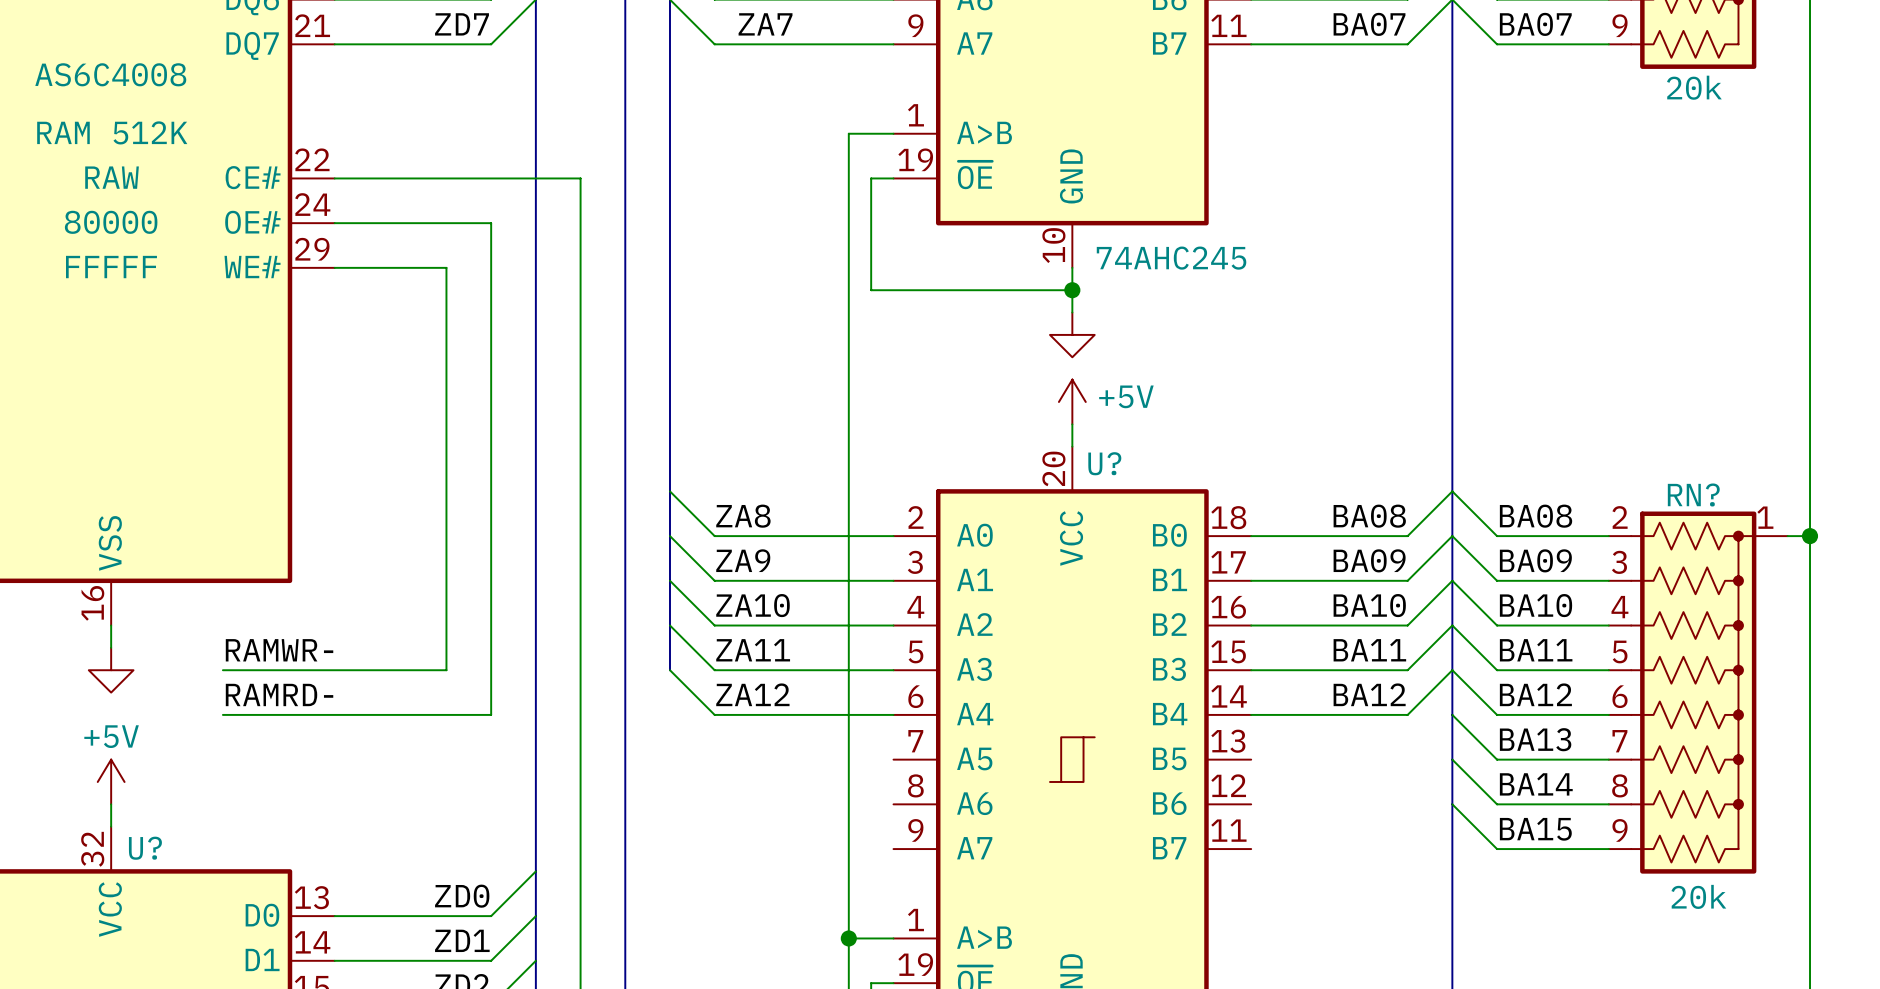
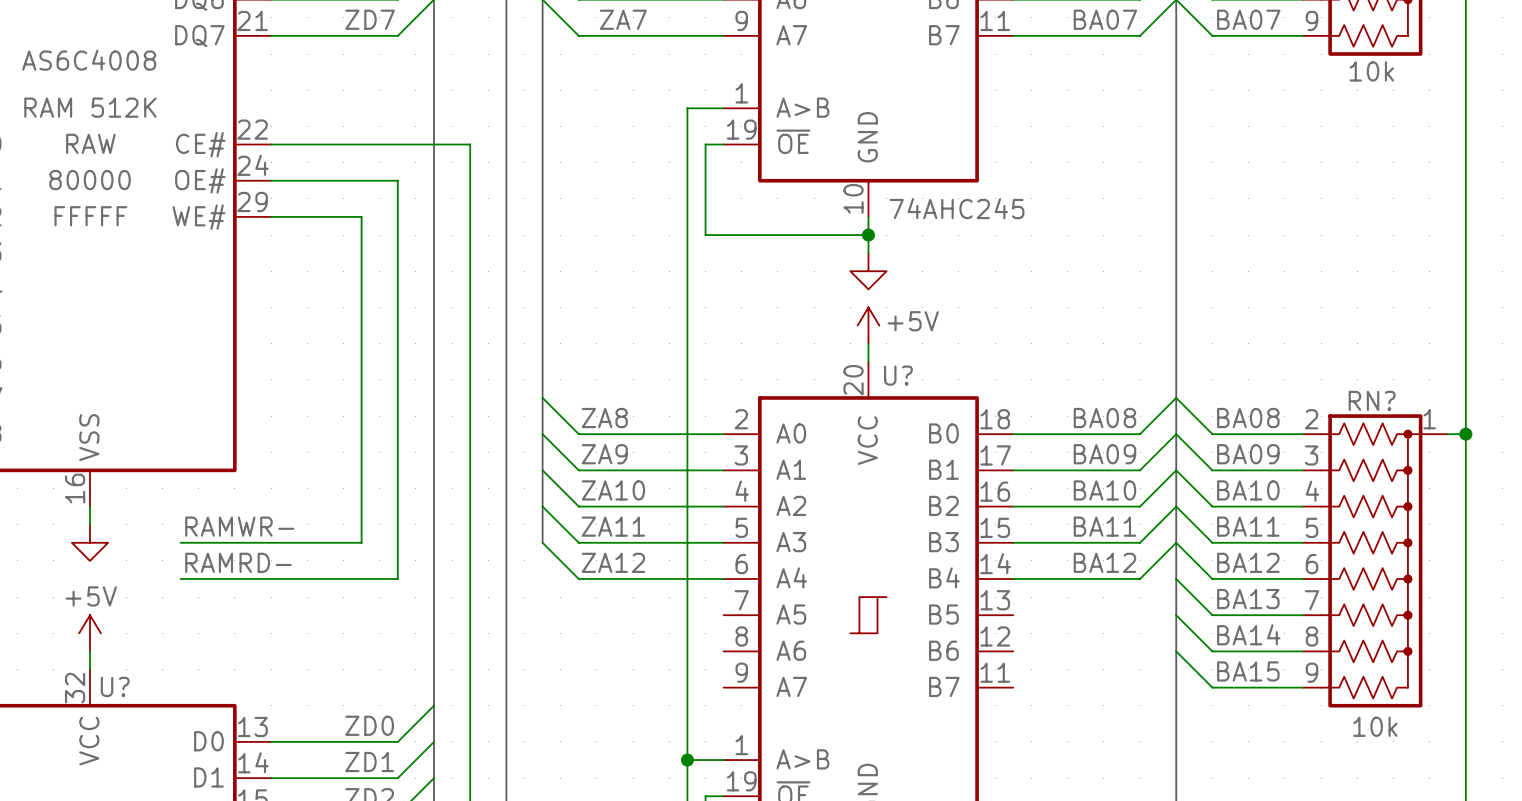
part value: 20k (1694, 87) -> 10k (1371, 71)
RN? value: 20k (1698, 896) -> 10k (1375, 726)

